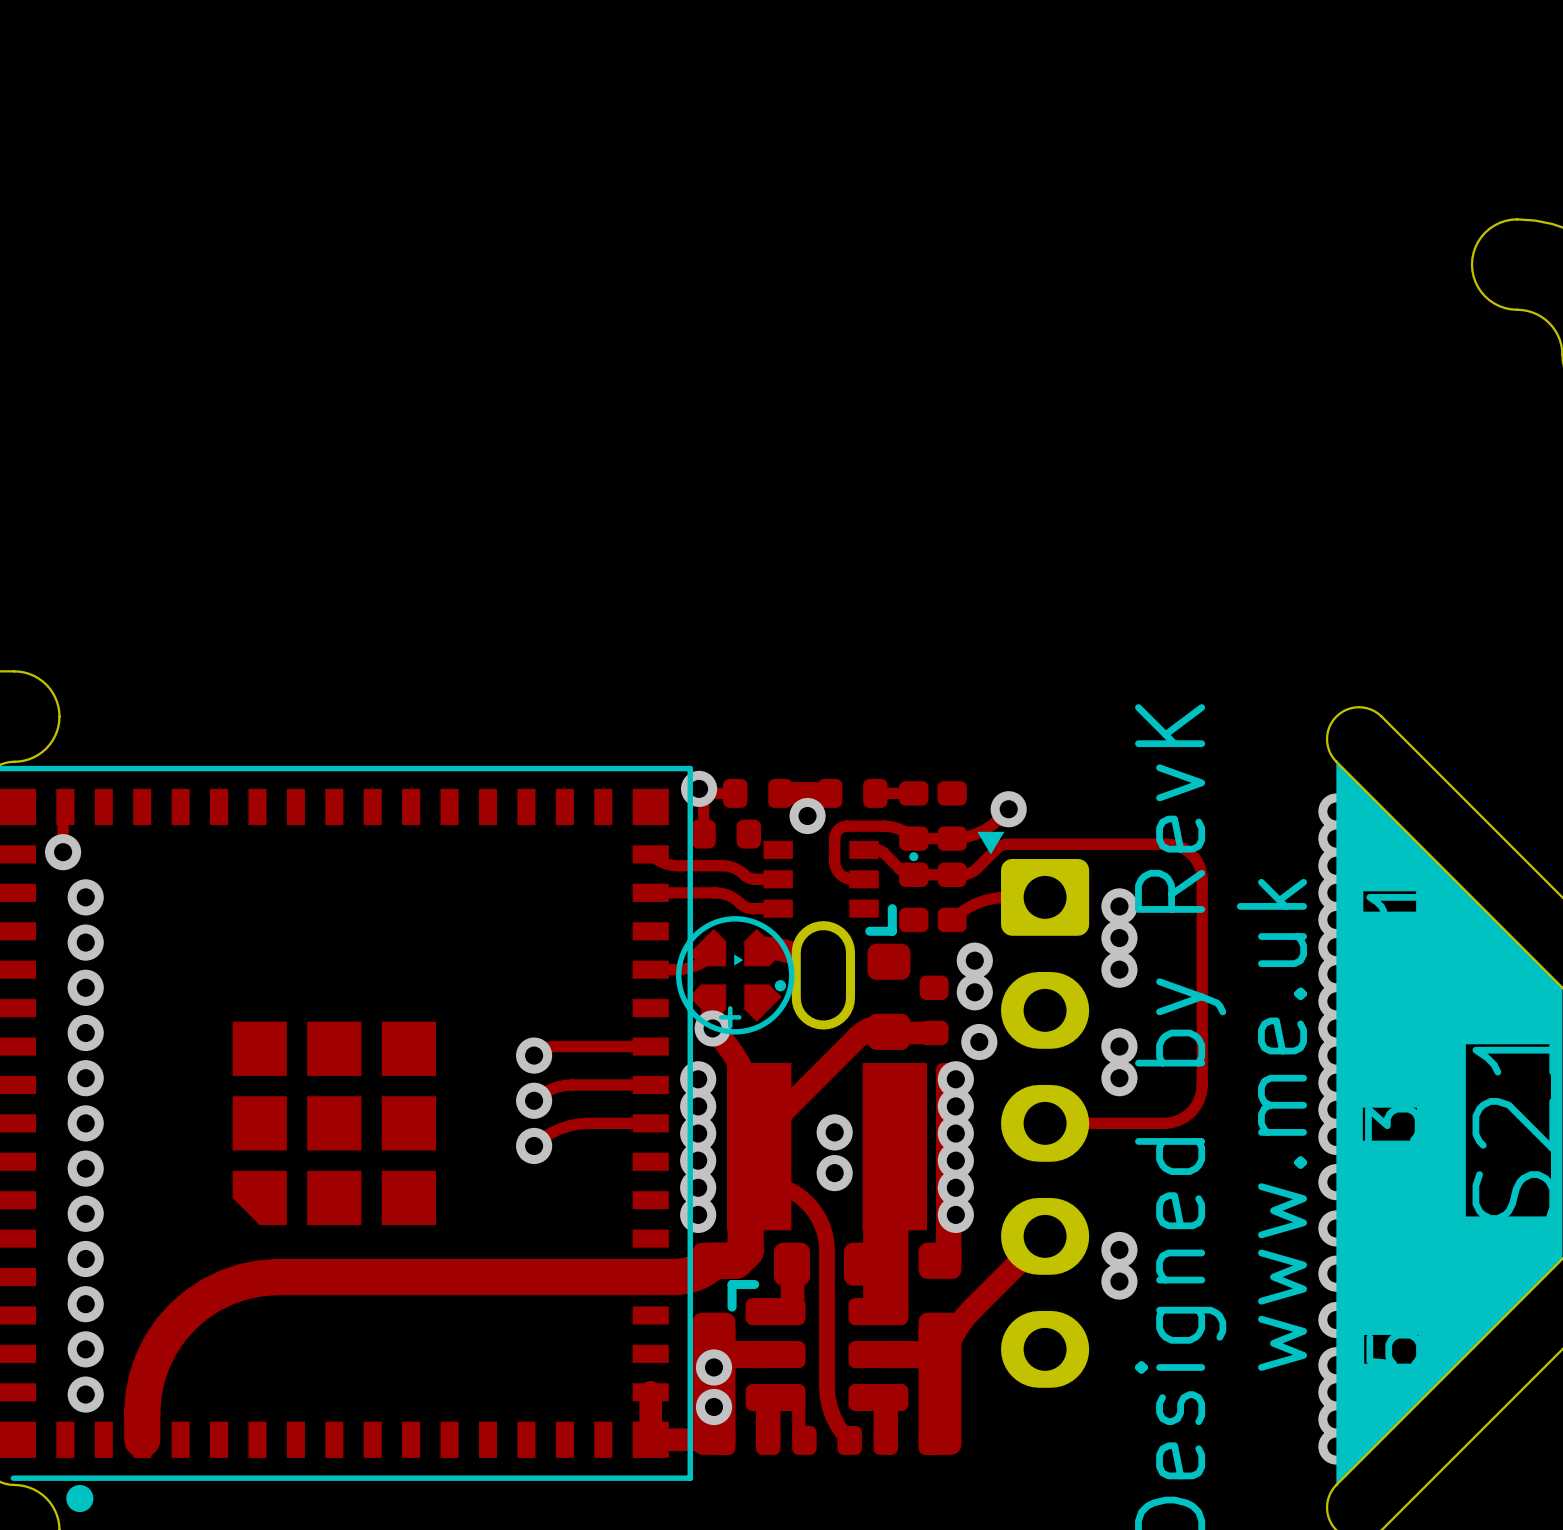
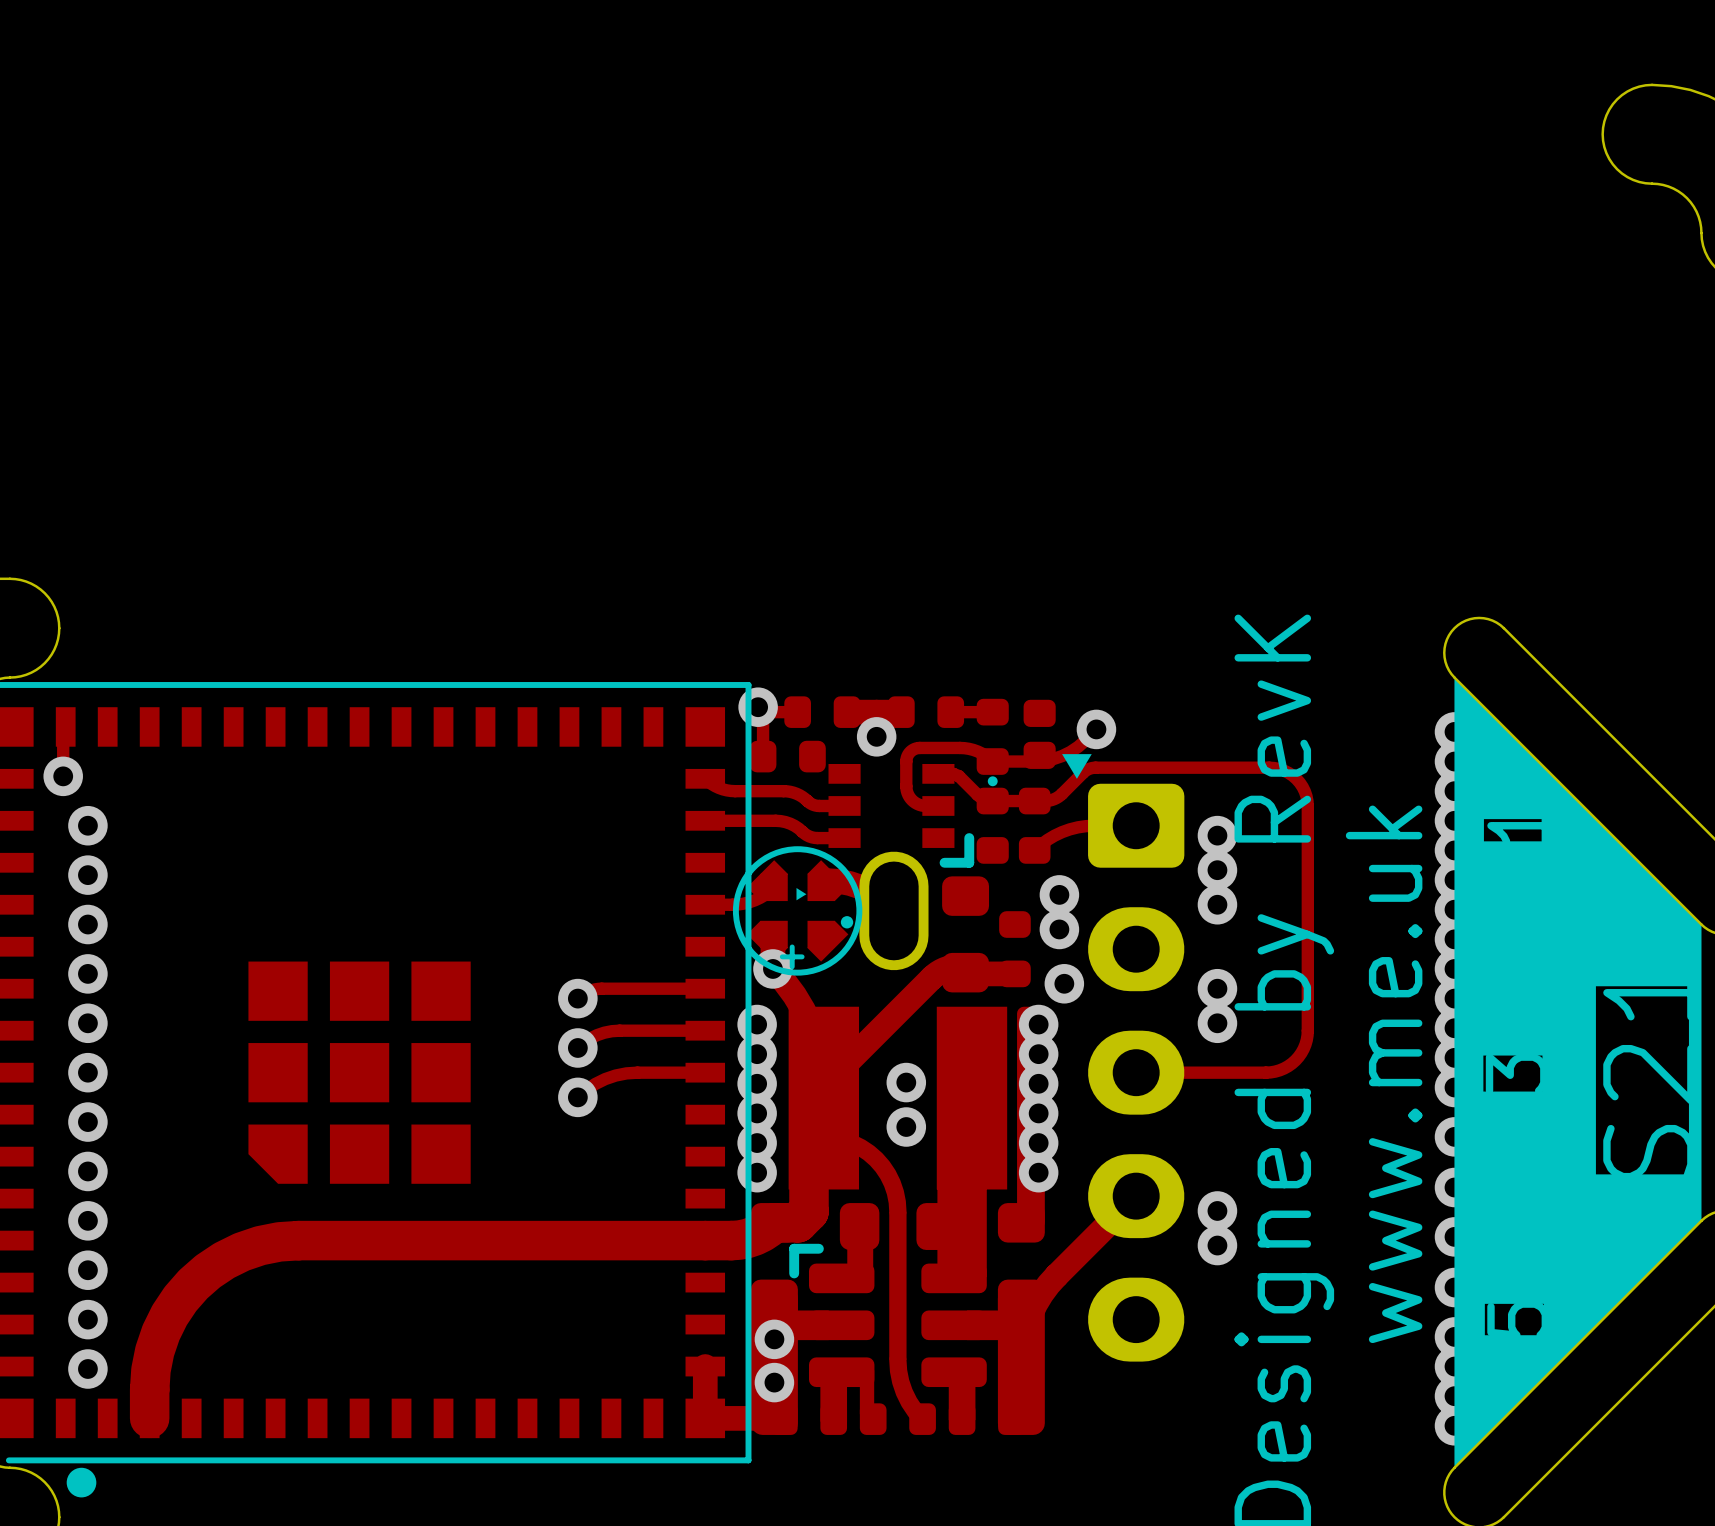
part footprint: [937, 781, 967, 851] -> [1023, 699, 1056, 769]

